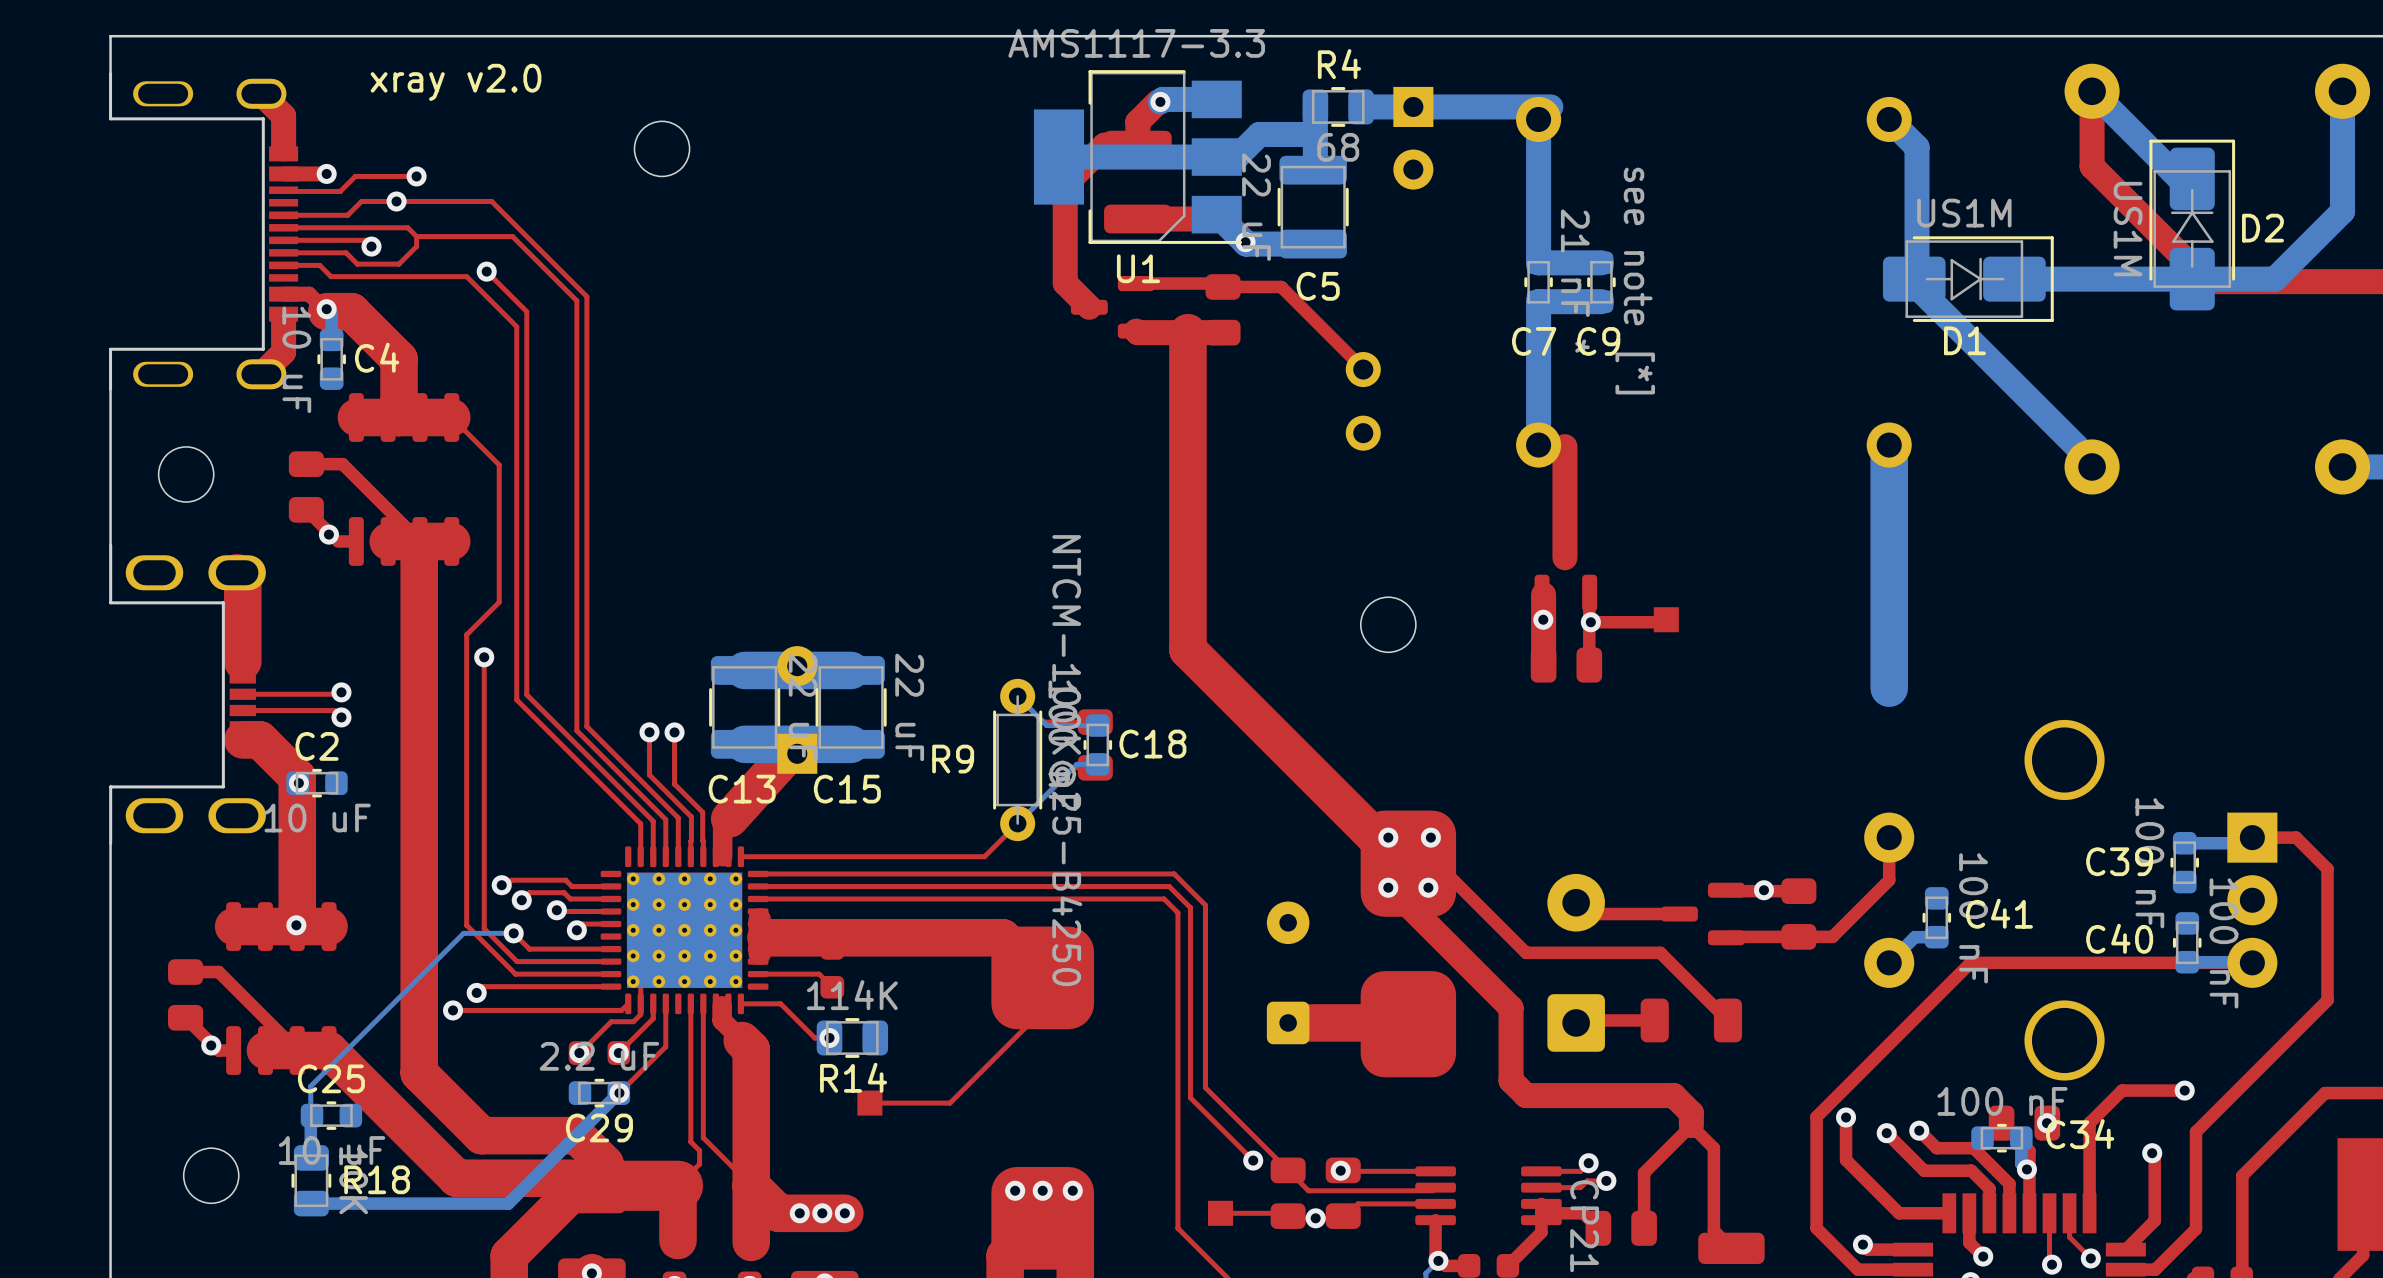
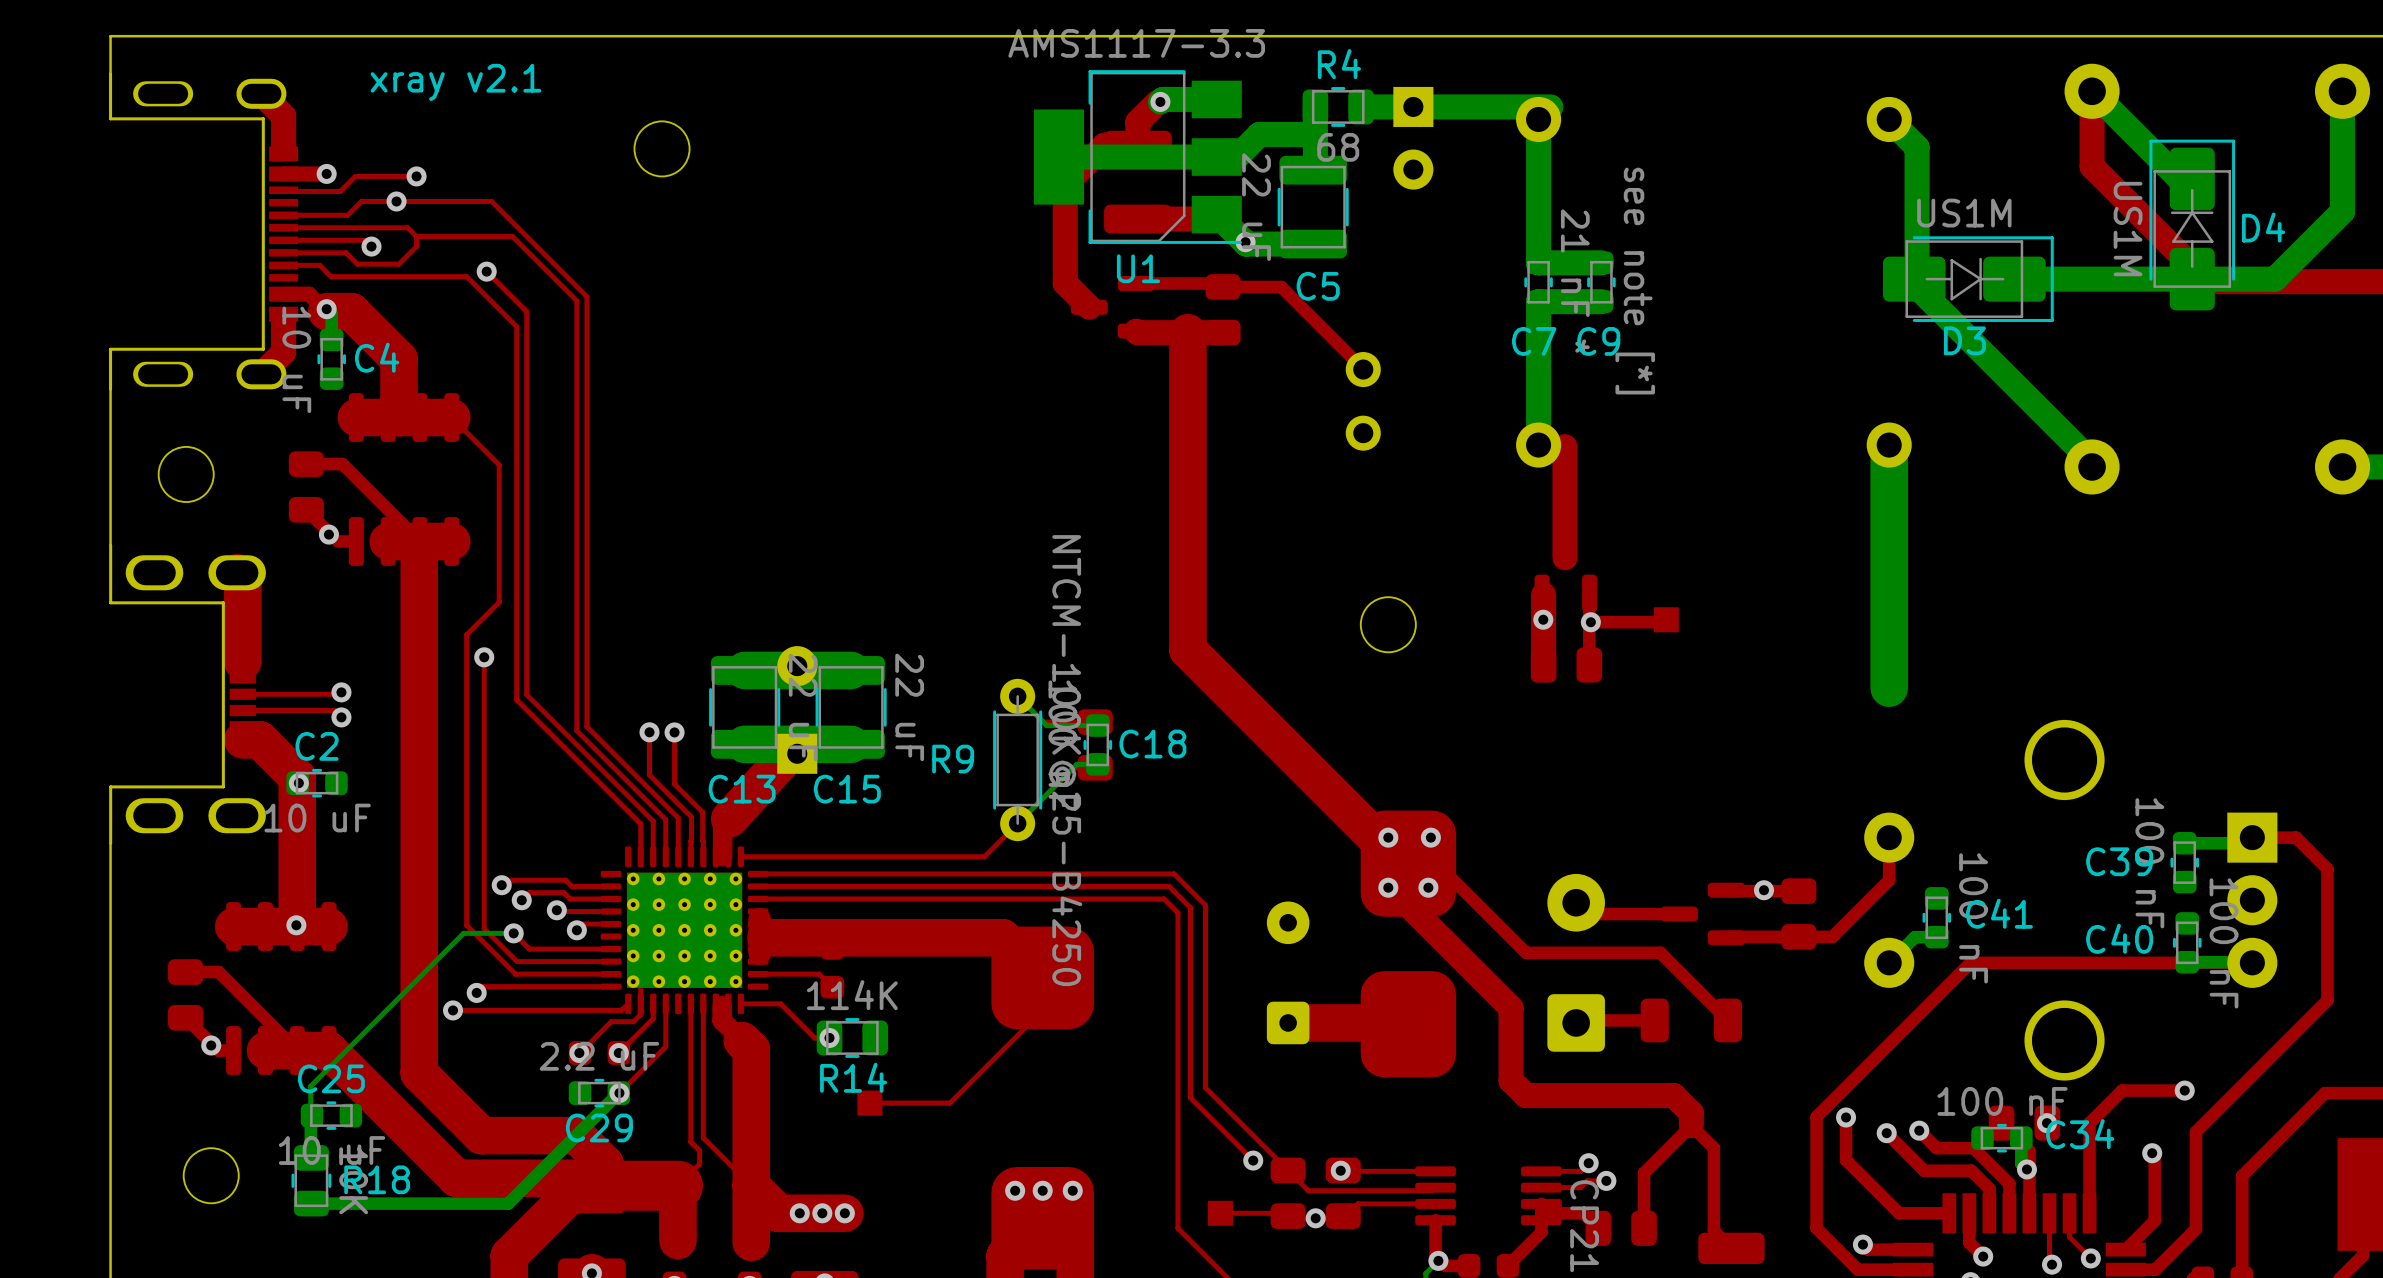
text: xray v2.0 (456, 82) -> xray v2.1 (456, 82)
D2 name: D2 (2262, 228) -> D4 (2263, 227)
D1 name: D1 (1964, 340) -> D3 (1964, 340)

